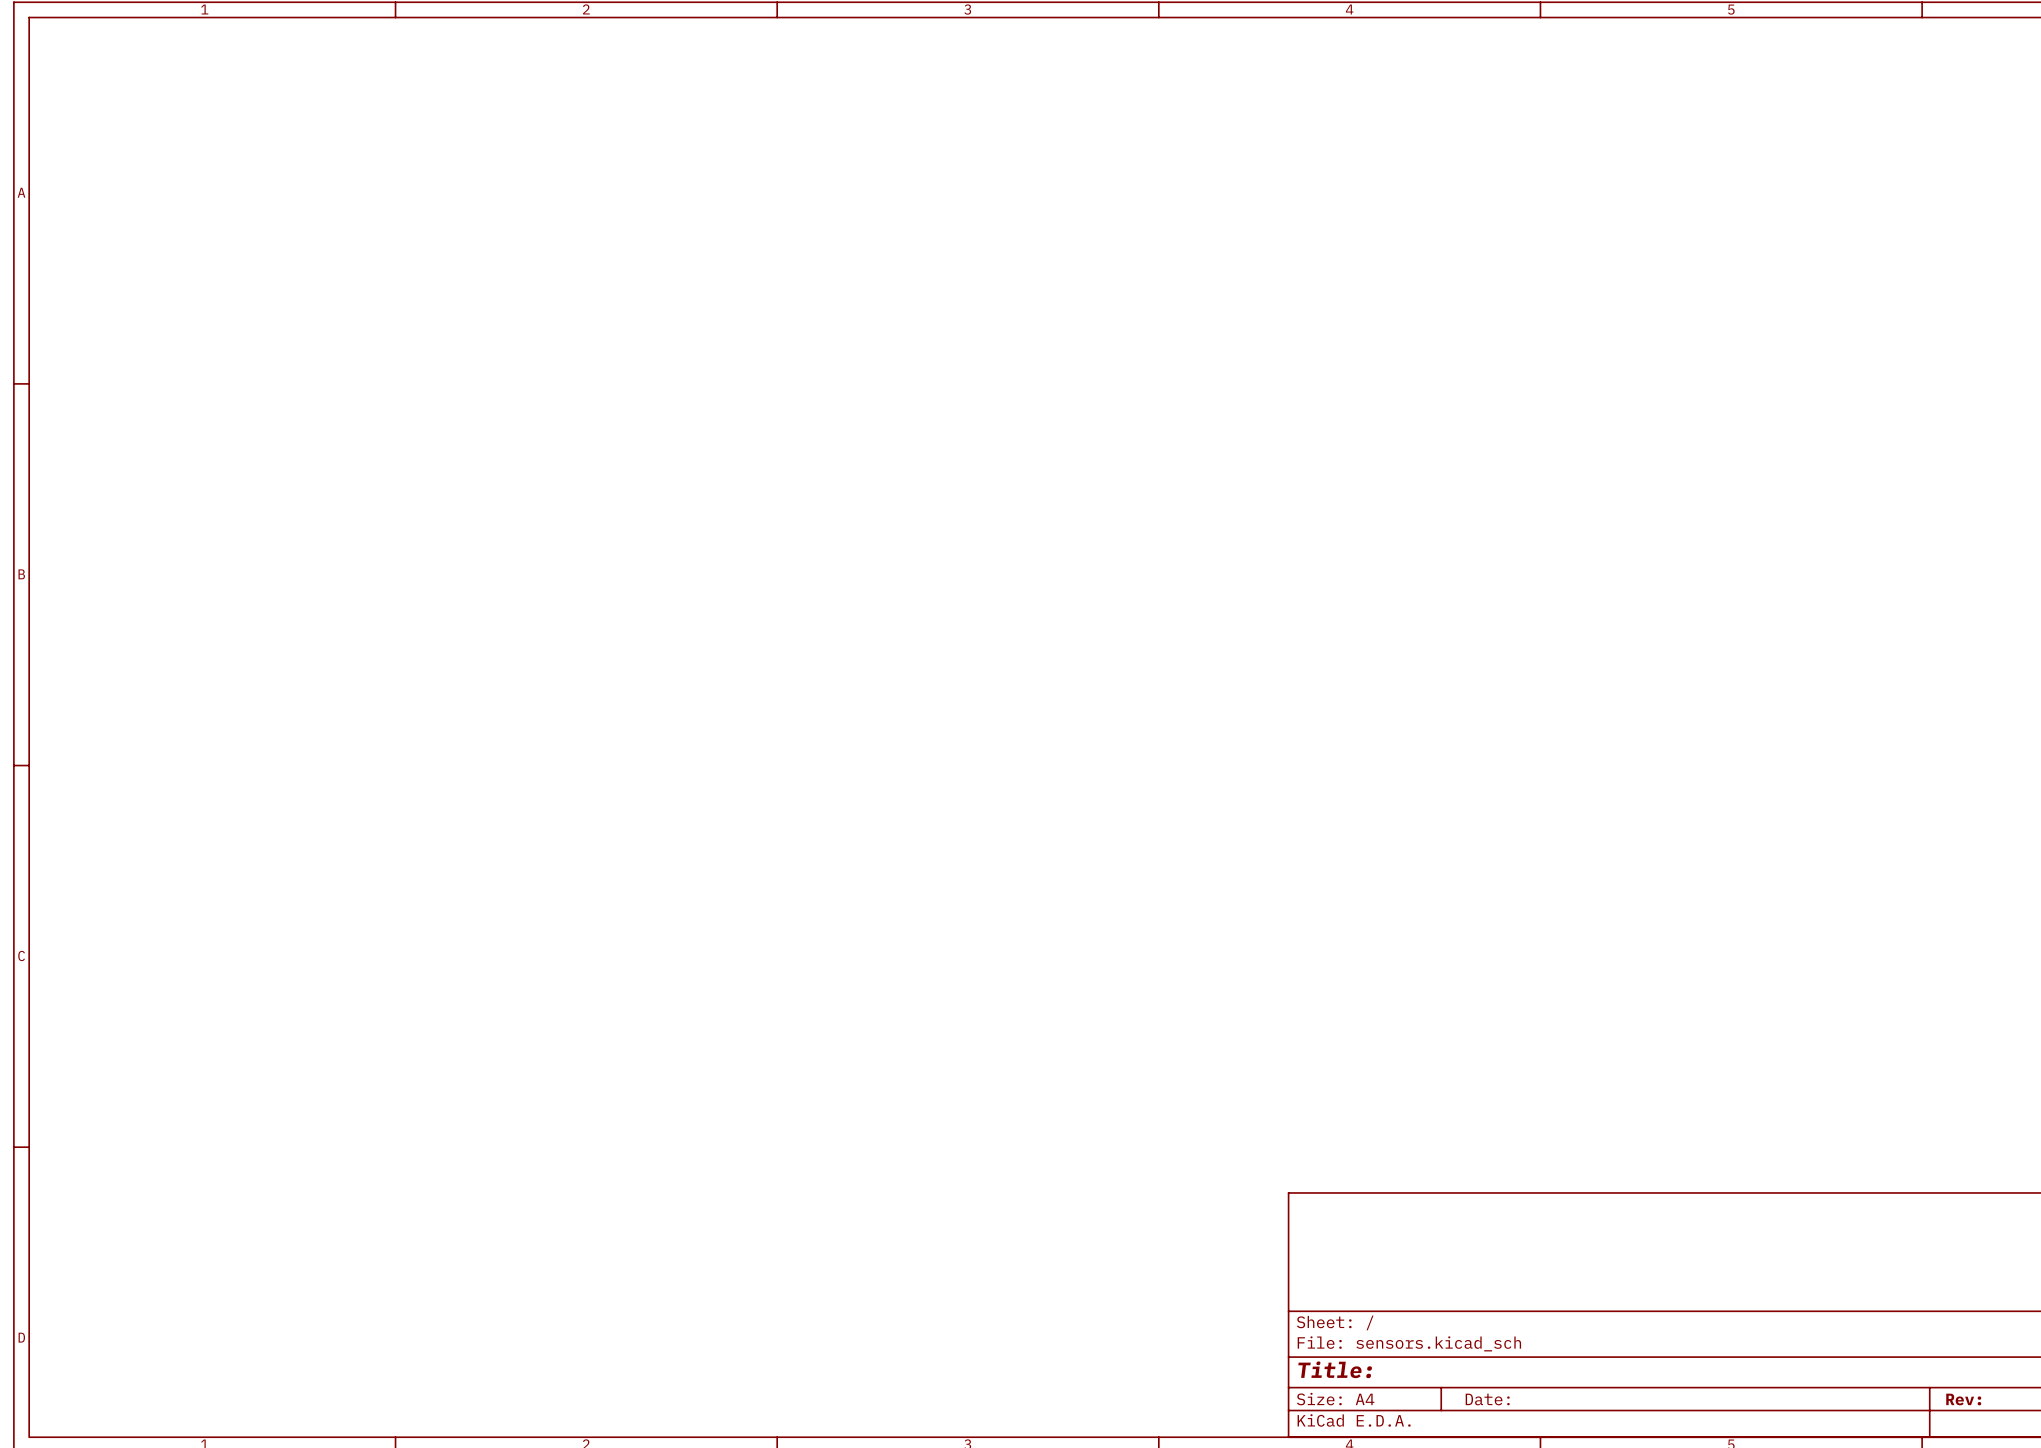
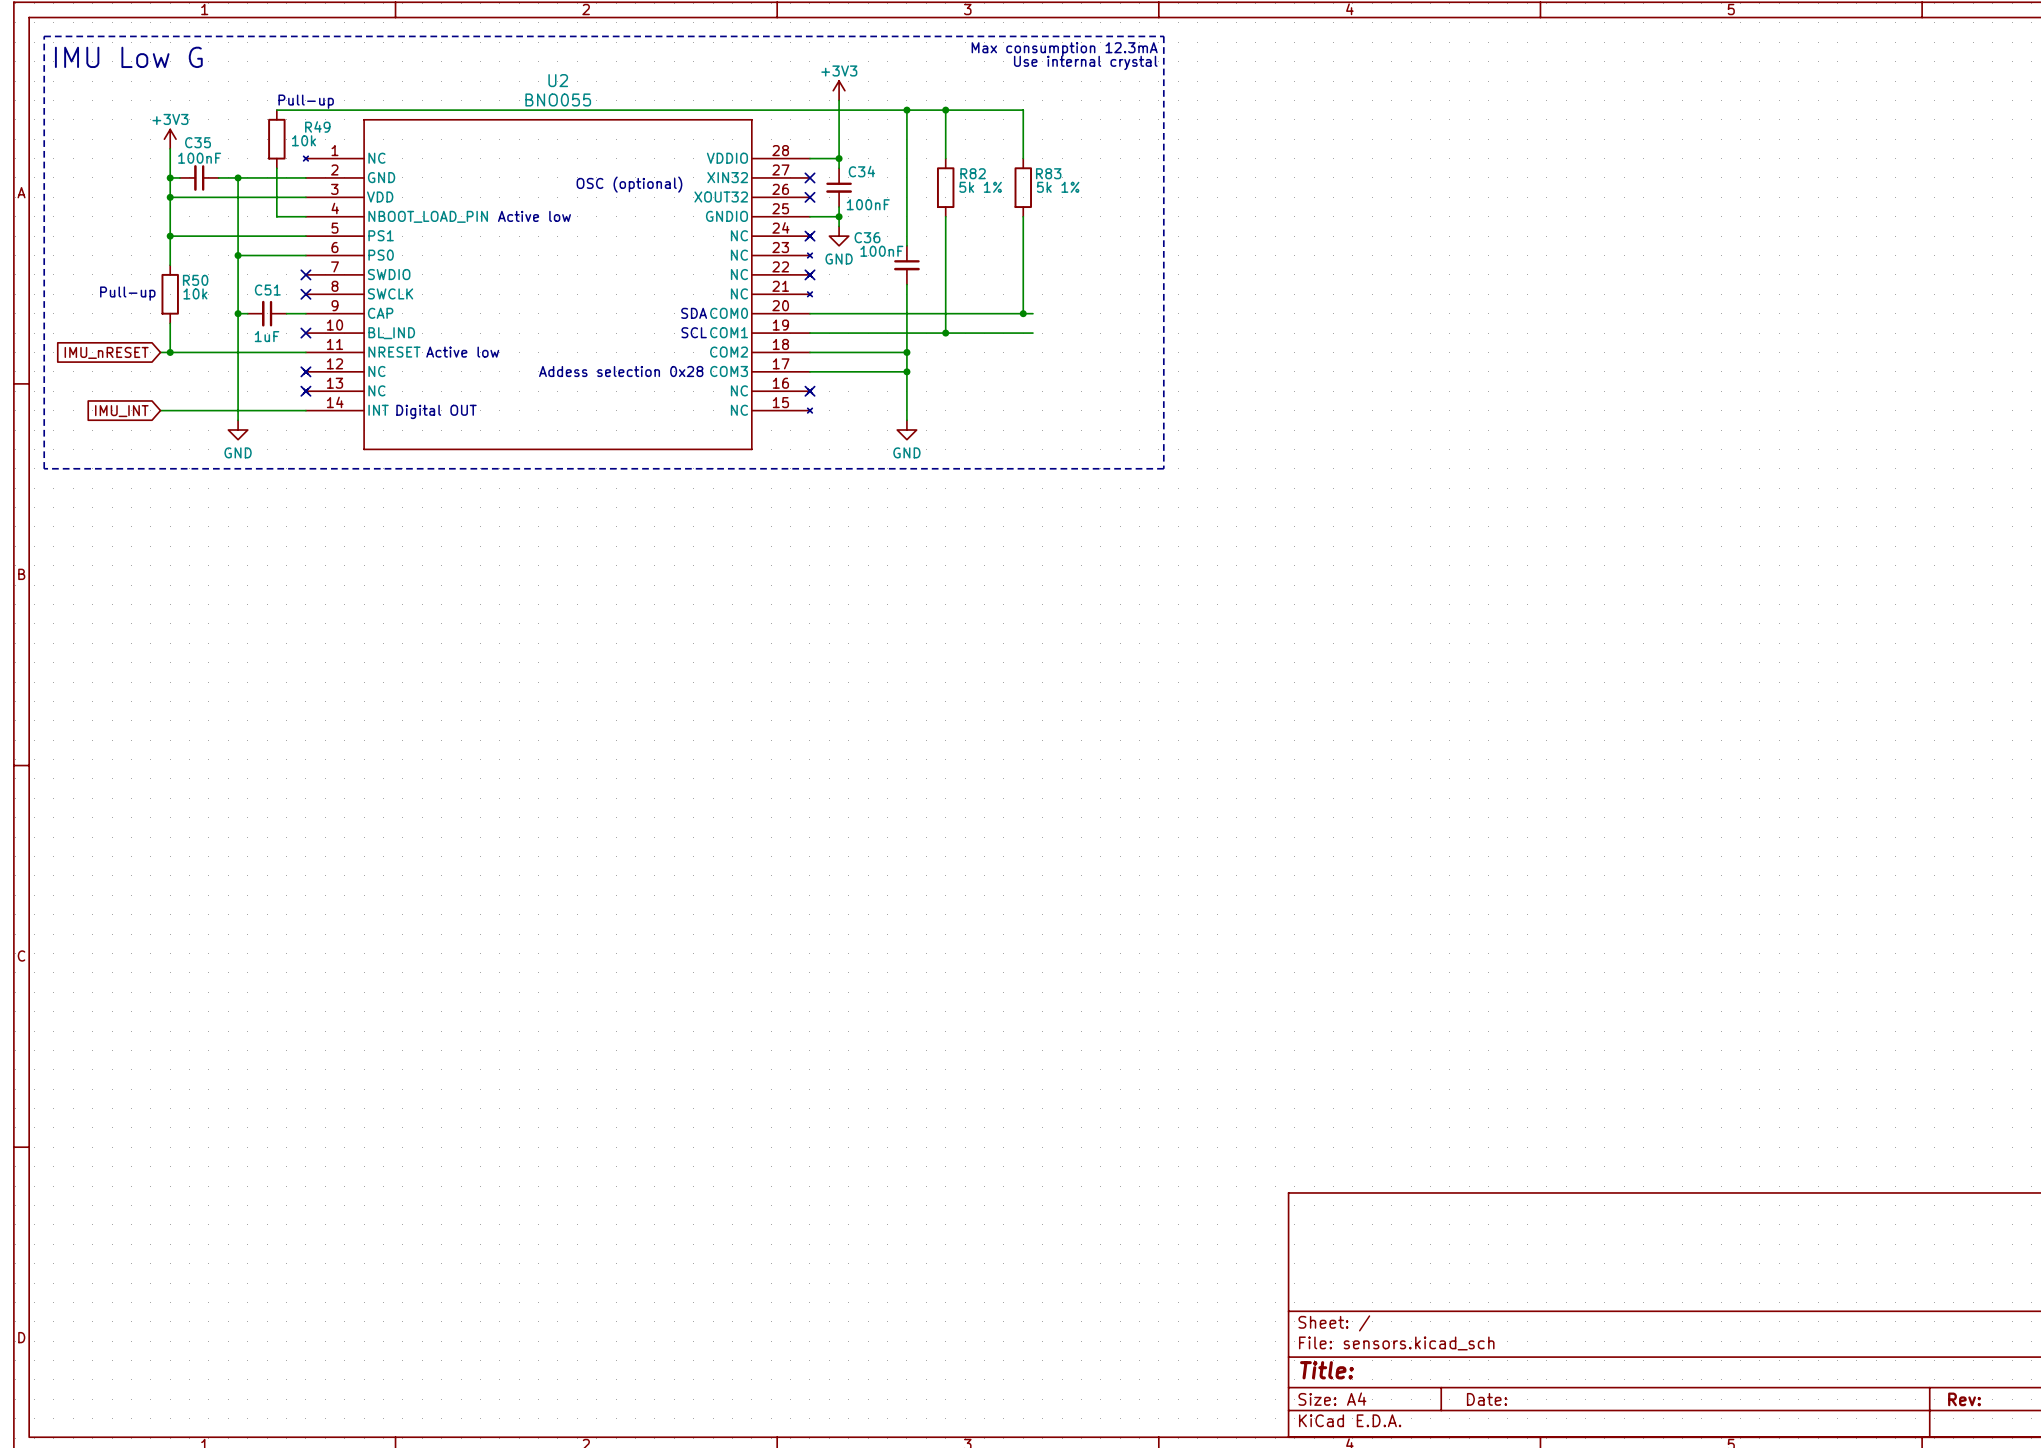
line: none -> (44, 36) (1163, 36) (1163, 468) (44, 468) (44, 36)
text: none -> Max consumption 12.3mA (1064, 49)
text: none -> IMU Low G (128, 57)
text: none -> Use internal crystal (1085, 62)
power symbol: none -> +3V3 (839, 90)
wire: none -> (839, 100) (839, 168)
text: none -> Pull-up (306, 101)
wire: none -> (276, 110) (1023, 110) (1023, 158)
wire: none -> (906, 110) (906, 245)
junction: none -> (906, 110)
wire: none -> (945, 110) (945, 158)
junction: none -> (945, 110)
power symbol: none -> +3V3 (170, 139)
R49: none -> 10k (276, 139)
wire: none -> (170, 148) (170, 265)
wire: none -> (809, 158) (839, 158)
junction: none -> (839, 158)
wire: none -> (276, 168) (276, 216) (305, 216)
wire: none -> (170, 177) (179, 177)
junction: none -> (170, 177)
C35: none -> 100nF (199, 177)
wire: none -> (218, 177) (305, 177)
wire: none -> (238, 177) (238, 420)
junction: none -> (238, 177)
no-connect mark: none -> (809, 177)
text: none -> OSC (optional) (629, 184)
C34: none -> 100nF (839, 187)
R82: none -> 5k 1% (945, 187)
R83: none -> 5k 1% (1023, 187)
wire: none -> (170, 197) (305, 197)
junction: none -> (170, 197)
no-connect mark: none -> (809, 197)
wire: none -> (839, 207) (839, 226)
text: none -> Active low (534, 216)
wire: none -> (809, 216) (839, 216)
junction: none -> (839, 216)
wire: none -> (945, 216) (945, 333)
wire: none -> (1023, 216) (1023, 313)
wire: none -> (170, 236) (305, 236)
junction: none -> (170, 236)
no-connect mark: none -> (809, 236)
power symbol: none -> GND (839, 236)
wire: none -> (238, 255) (305, 255)
junction: none -> (238, 255)
C36: none -> 100nF (906, 265)
no-connect mark: none -> (305, 274)
no-connect mark: none -> (809, 274)
U2: none -> BNO055 (557, 284)
wire: none -> (906, 284) (906, 420)
text: none -> Pull-up (127, 293)
R50: none -> 10k (170, 294)
no-connect mark: none -> (305, 294)
wire: none -> (238, 313) (247, 313)
junction: none -> (238, 313)
C51: none -> 1uF (267, 313)
wire: none -> (286, 313) (305, 313)
text: none -> SDA (694, 313)
wire: none -> (809, 313) (1032, 313)
junction: none -> (1023, 313)
wire: none -> (170, 323) (170, 352)
text: none -> SCL (694, 332)
no-connect mark: none -> (305, 333)
wire: none -> (809, 333) (1032, 333)
junction: none -> (945, 333)
text: none -> Active low (462, 352)
wire: none -> (160, 352) (305, 352)
junction: none -> (170, 352)
wire: none -> (809, 352) (906, 352)
junction: none -> (906, 352)
global label: none -> IMU_nRESET (106, 352)
no-connect mark: none -> (305, 371)
text: none -> Addess selection 0x28 (621, 371)
wire: none -> (809, 371) (906, 371)
junction: none -> (906, 371)
no-connect mark: none -> (305, 391)
no-connect mark: none -> (809, 391)
wire: none -> (160, 410) (305, 410)
global label: none -> IMU_INT (121, 411)
text: none -> Digital OUT (436, 411)
power symbol: none -> GND (238, 430)
power symbol: none -> GND (906, 430)

